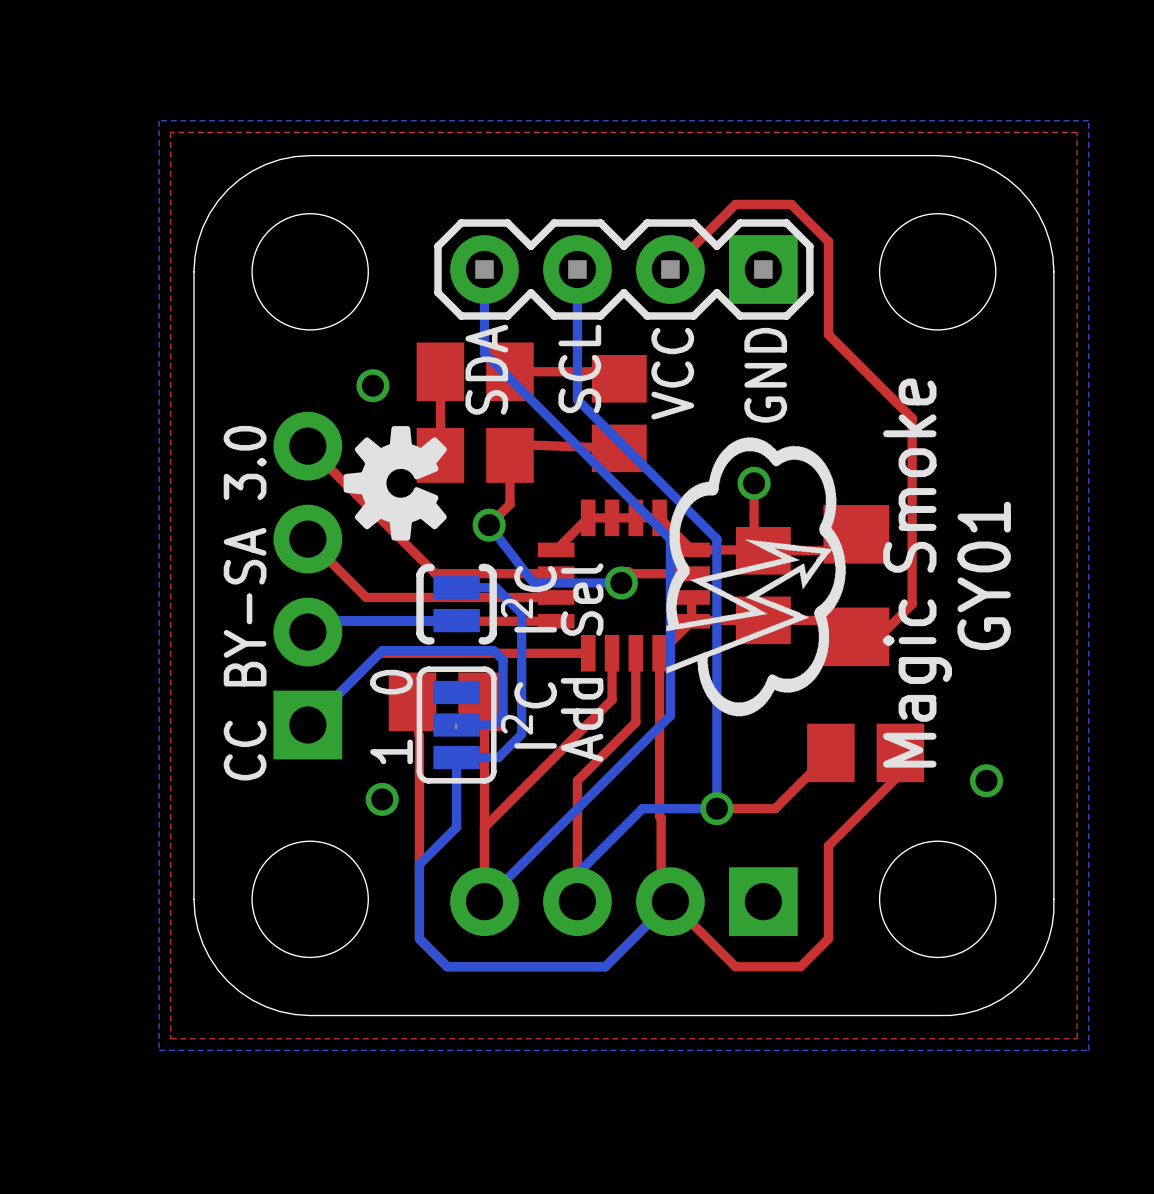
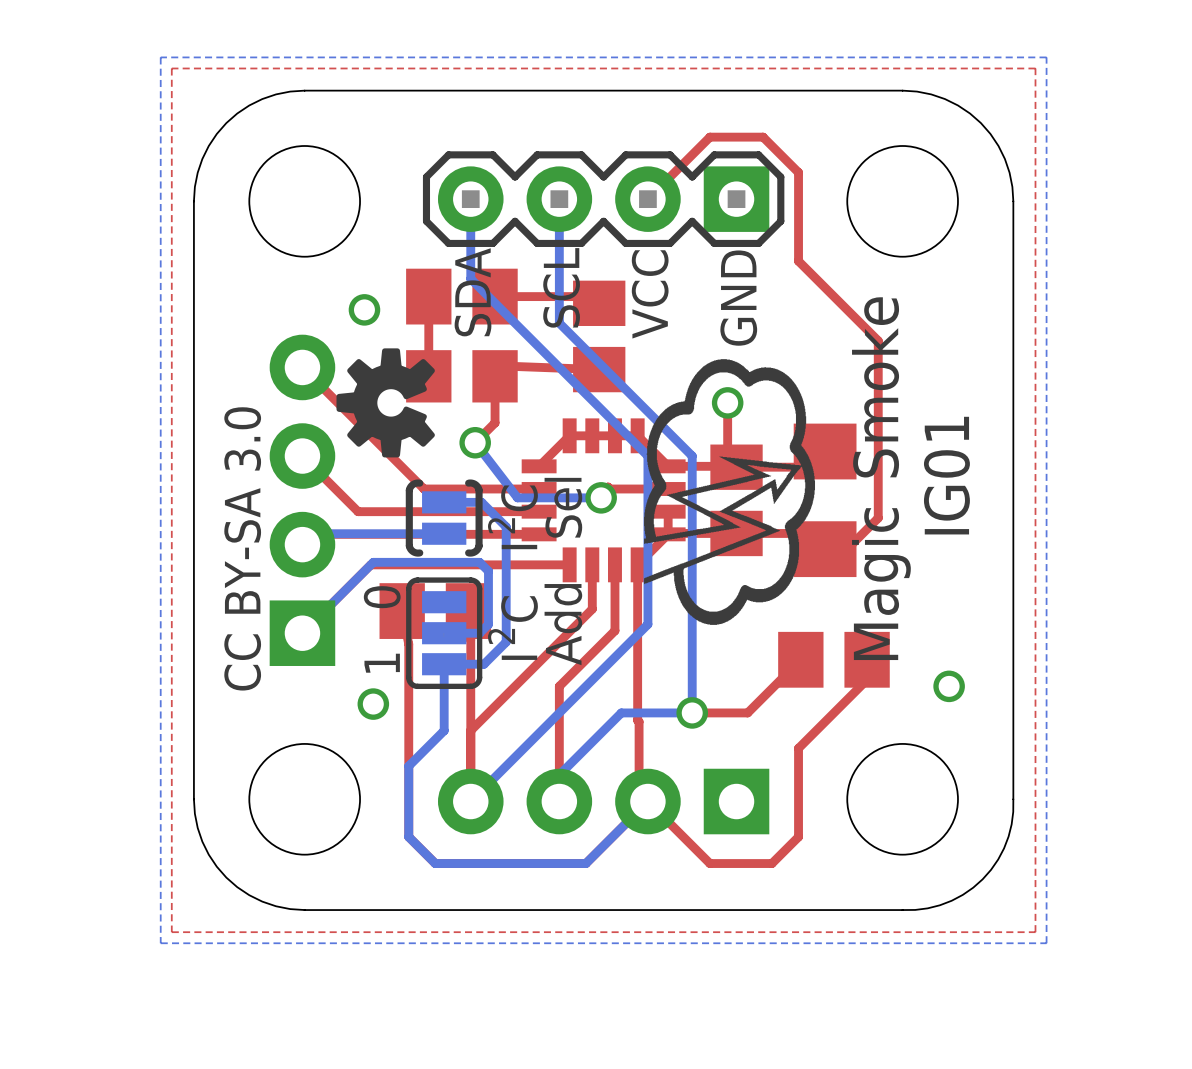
text: GY01 (984, 575) -> IG01 (946, 475)

